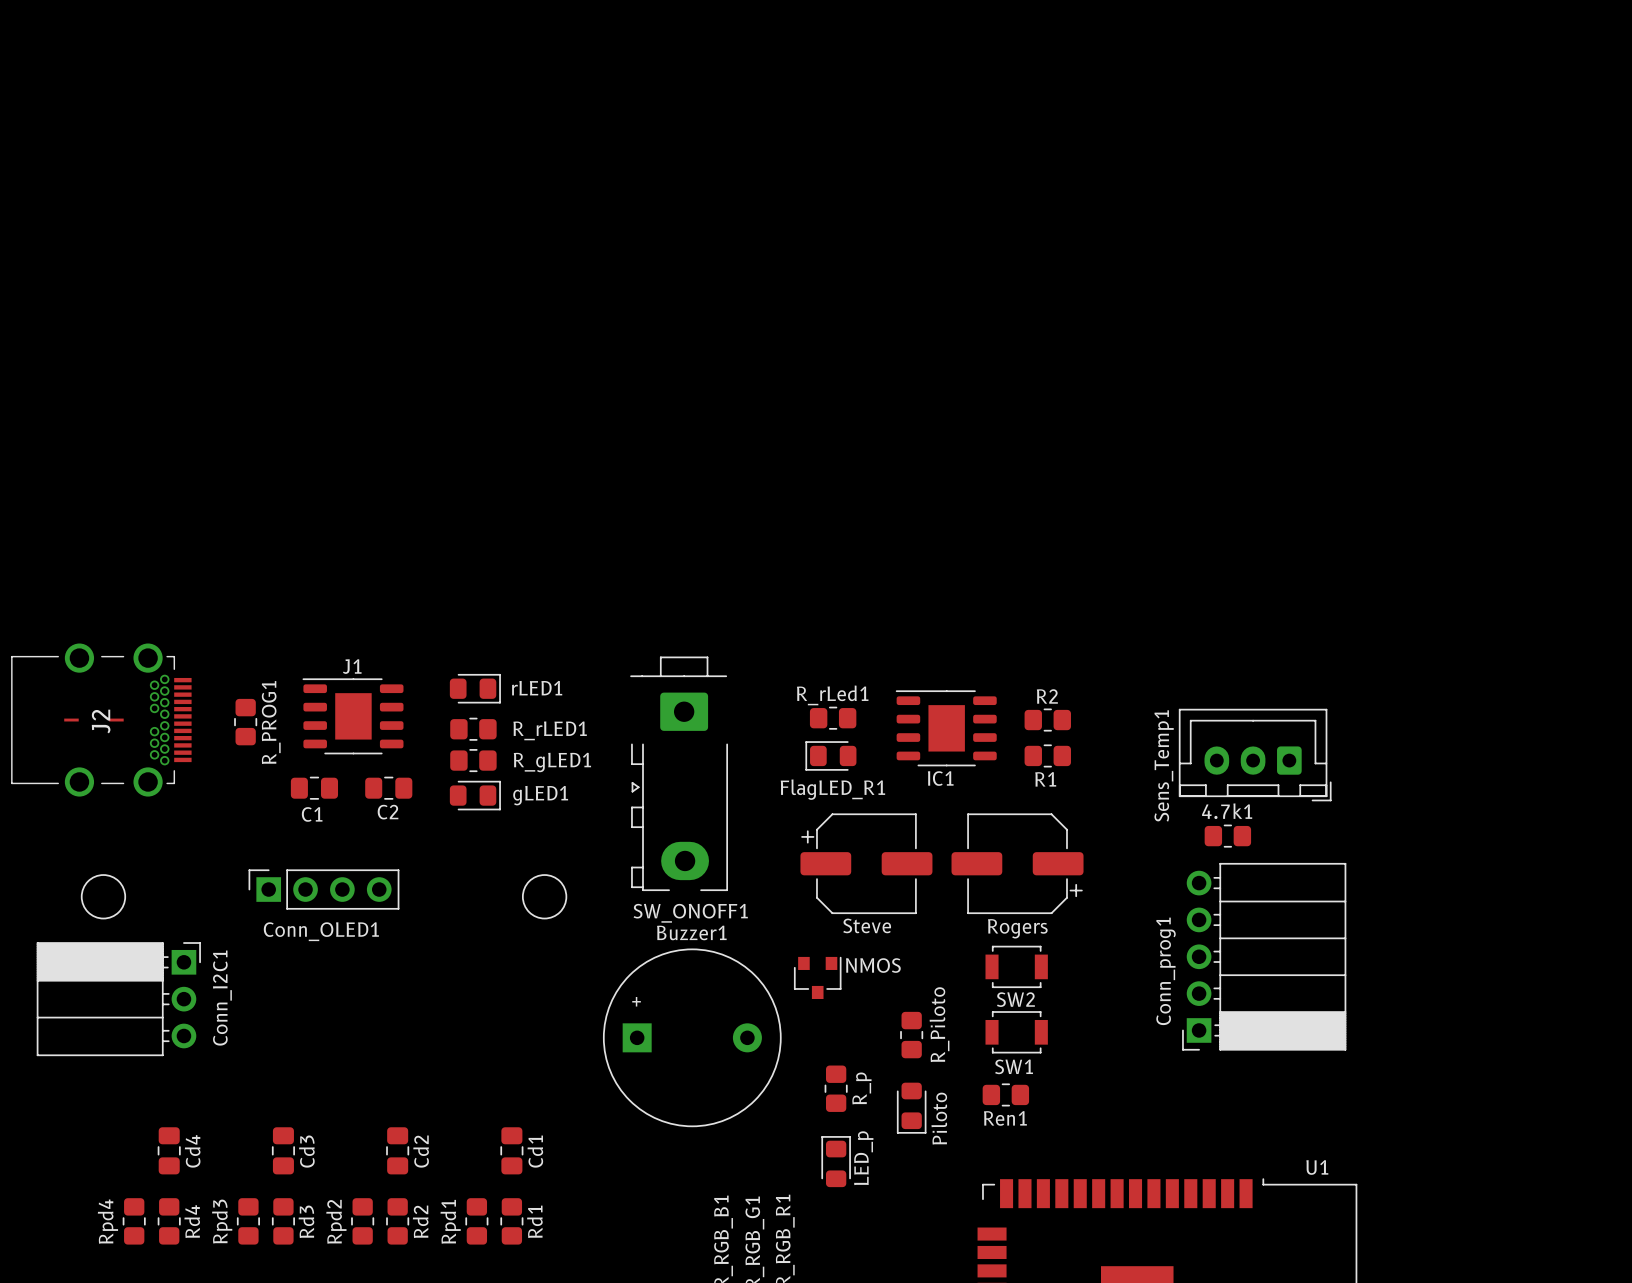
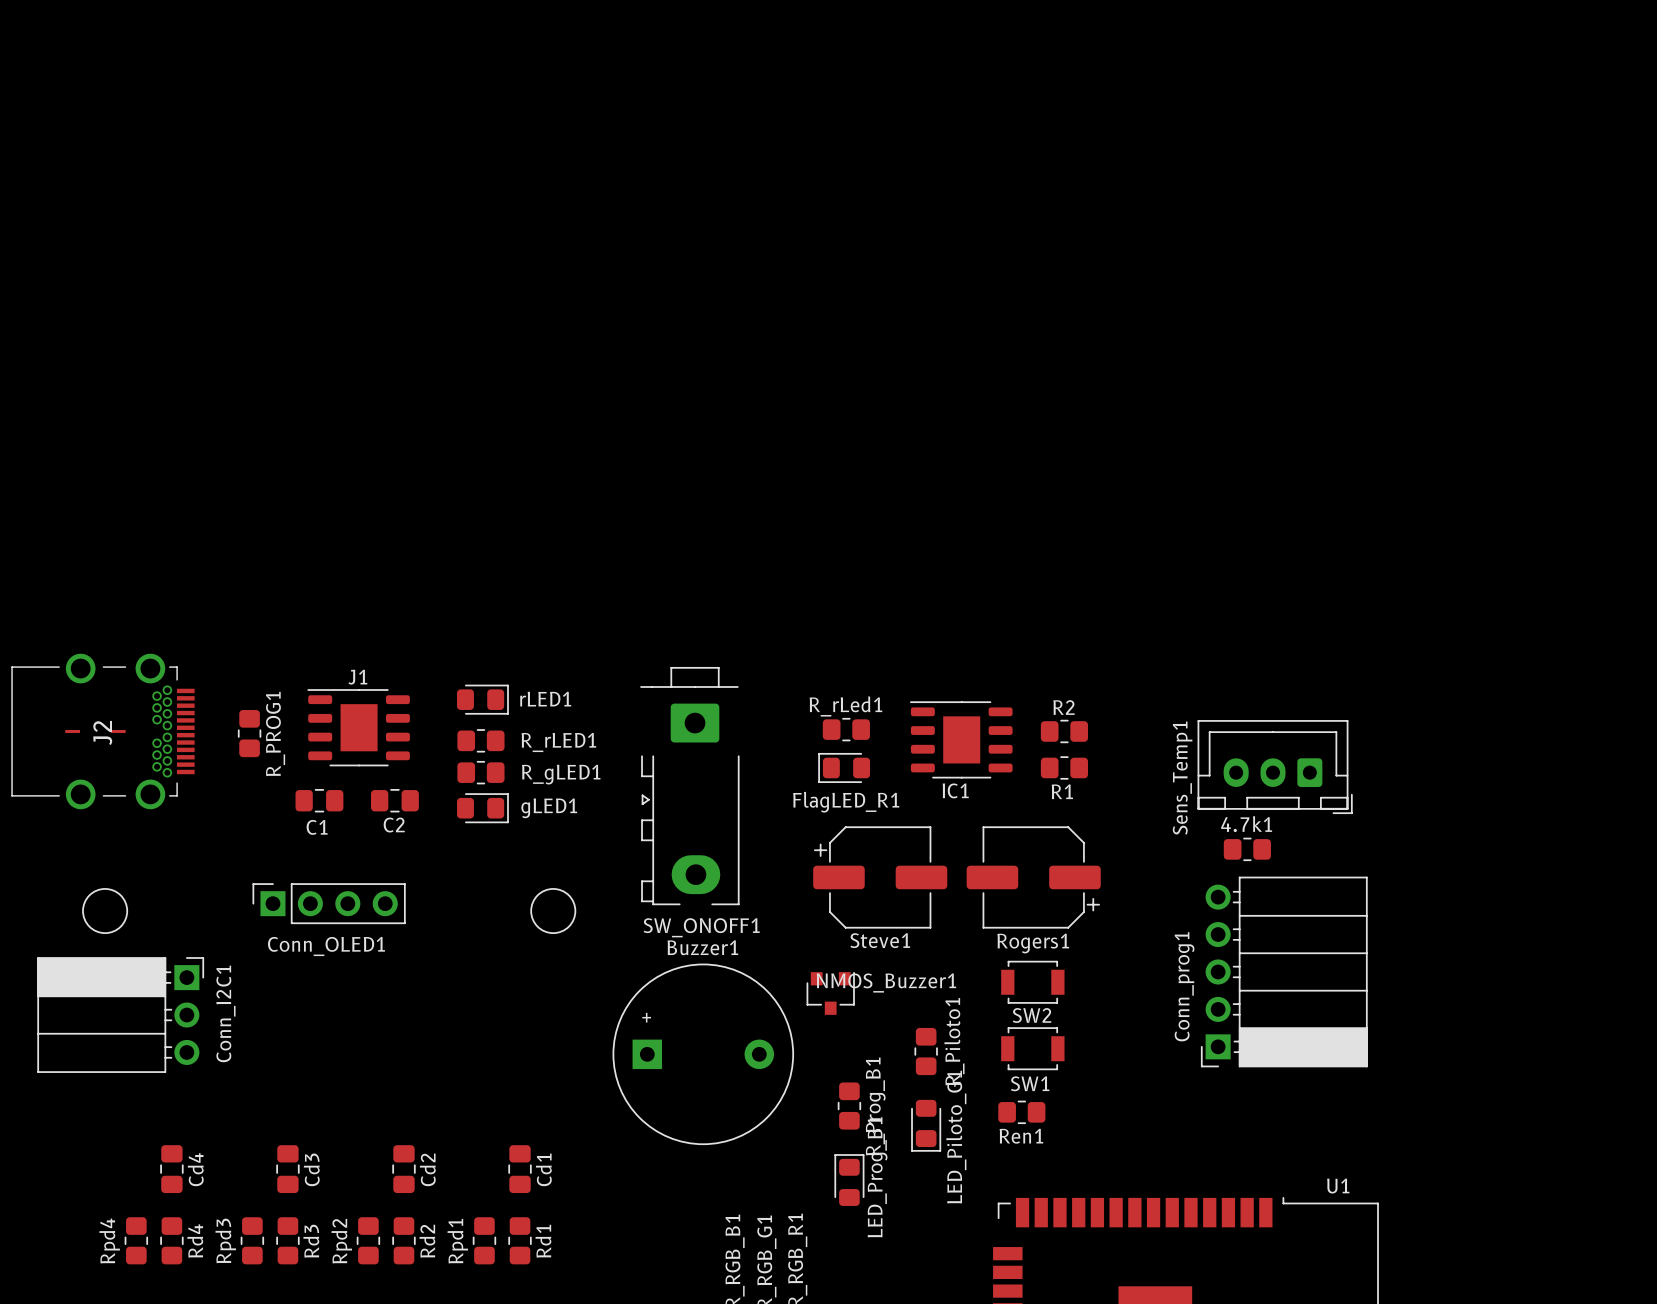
Steve name: Steve (867, 925) -> Steve1 (880, 940)
Rogers name: Rogers (1017, 928) -> Rogers1 (1033, 943)
NMOS name: NMOS (873, 965) -> NMOS_Buzzer1 (886, 982)
R_Piloto name: R_Piloto (939, 1024) -> R_Piloto1 (954, 1041)
R_p name: R_p (861, 1088) -> R_Prog_B1 (875, 1106)
Piloto name: Piloto (939, 1118) -> LED_Piloto_G1 (956, 1137)
LED_p name: LED_p (863, 1158) -> LED_Prog_B1 (877, 1177)

